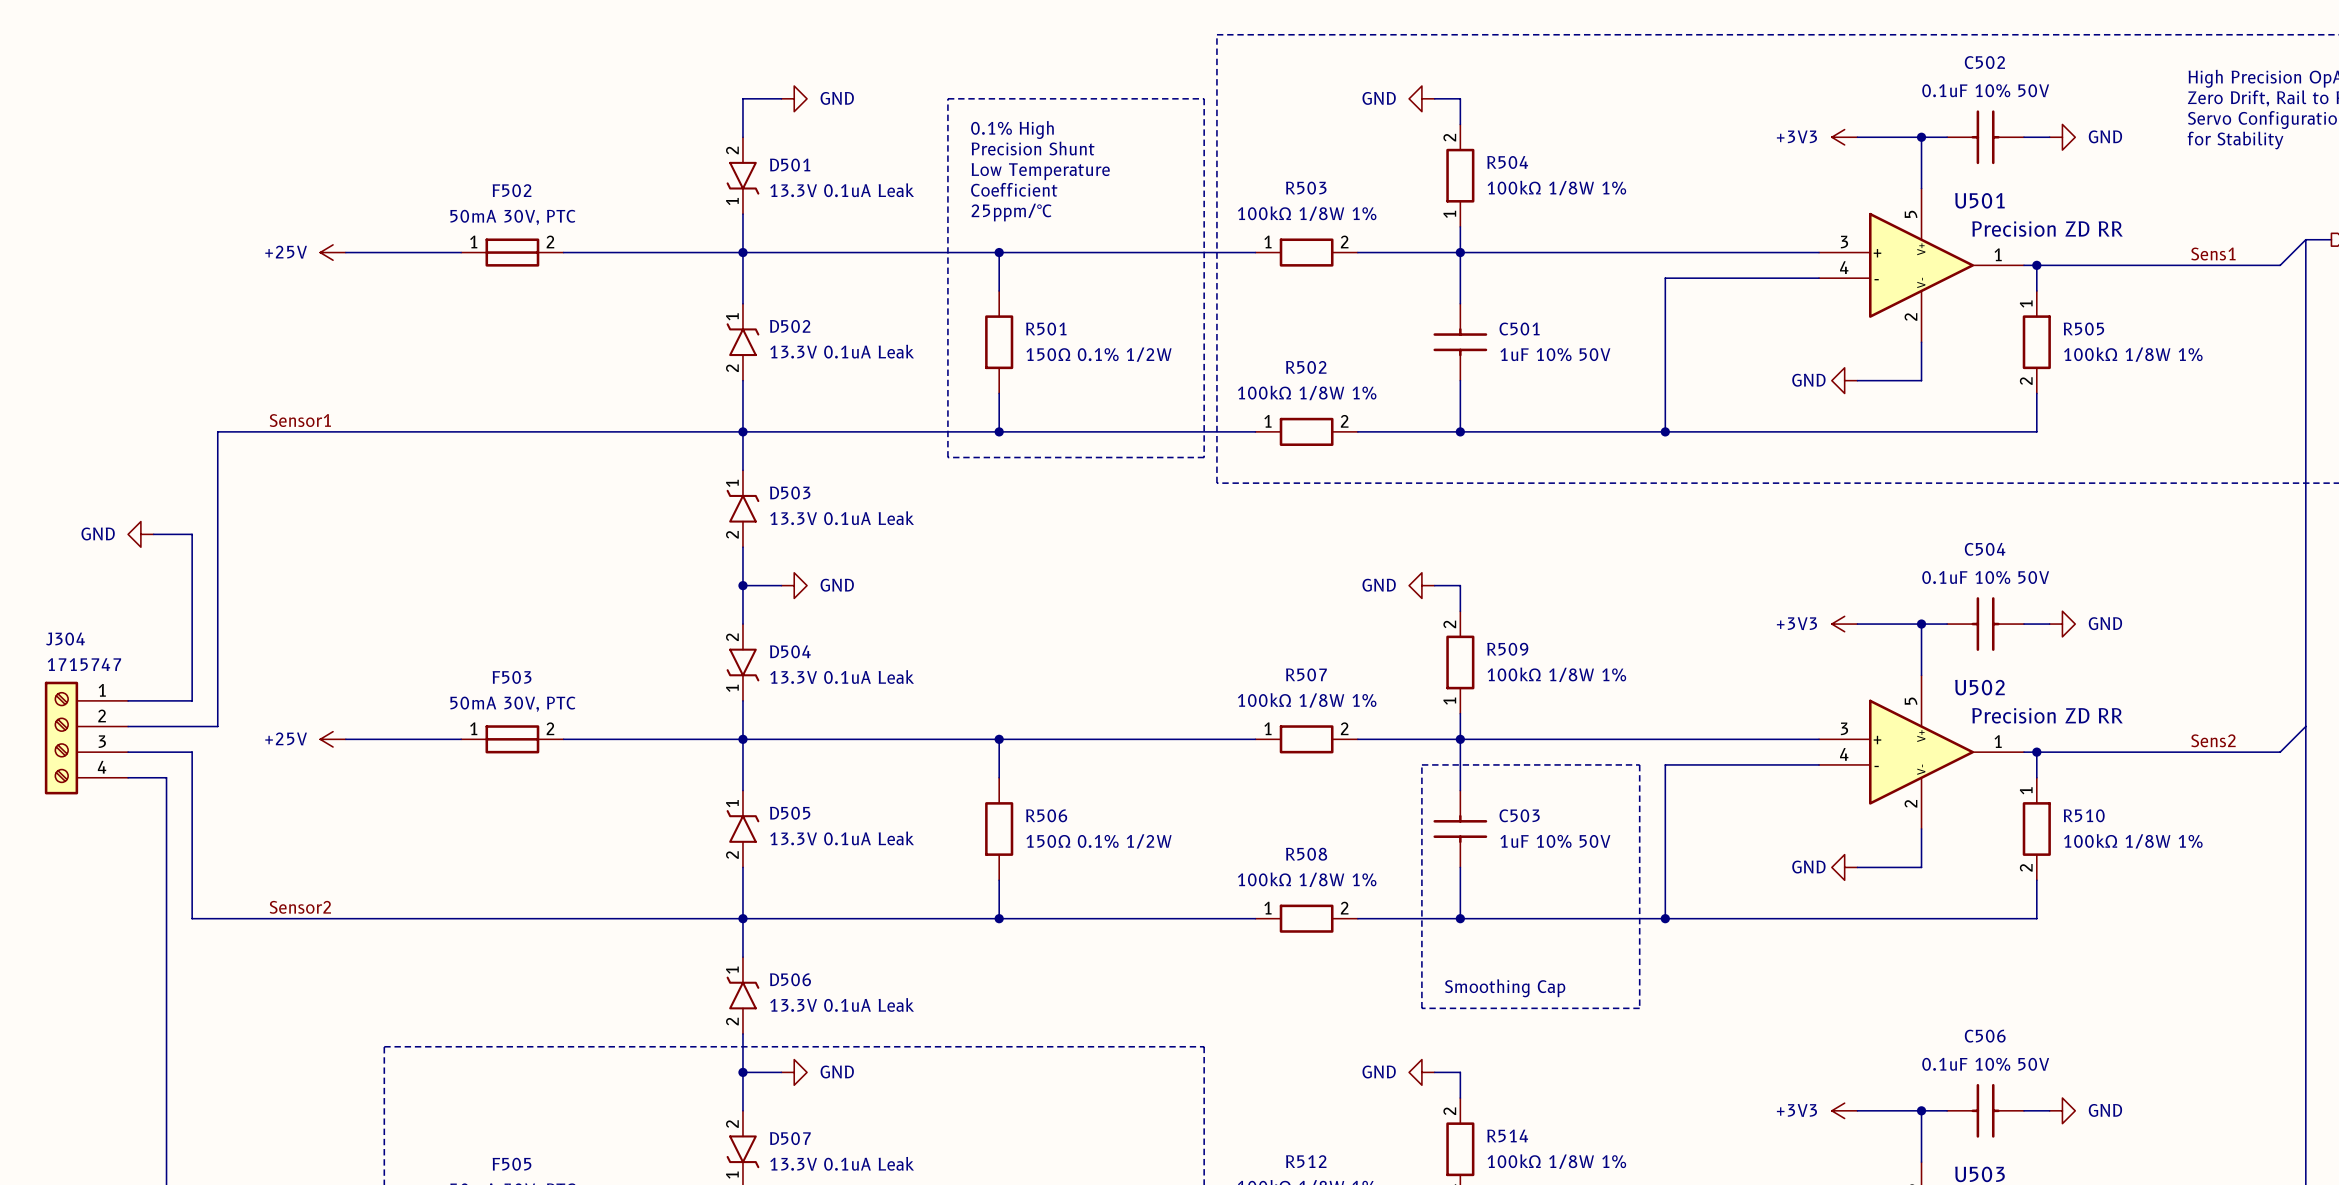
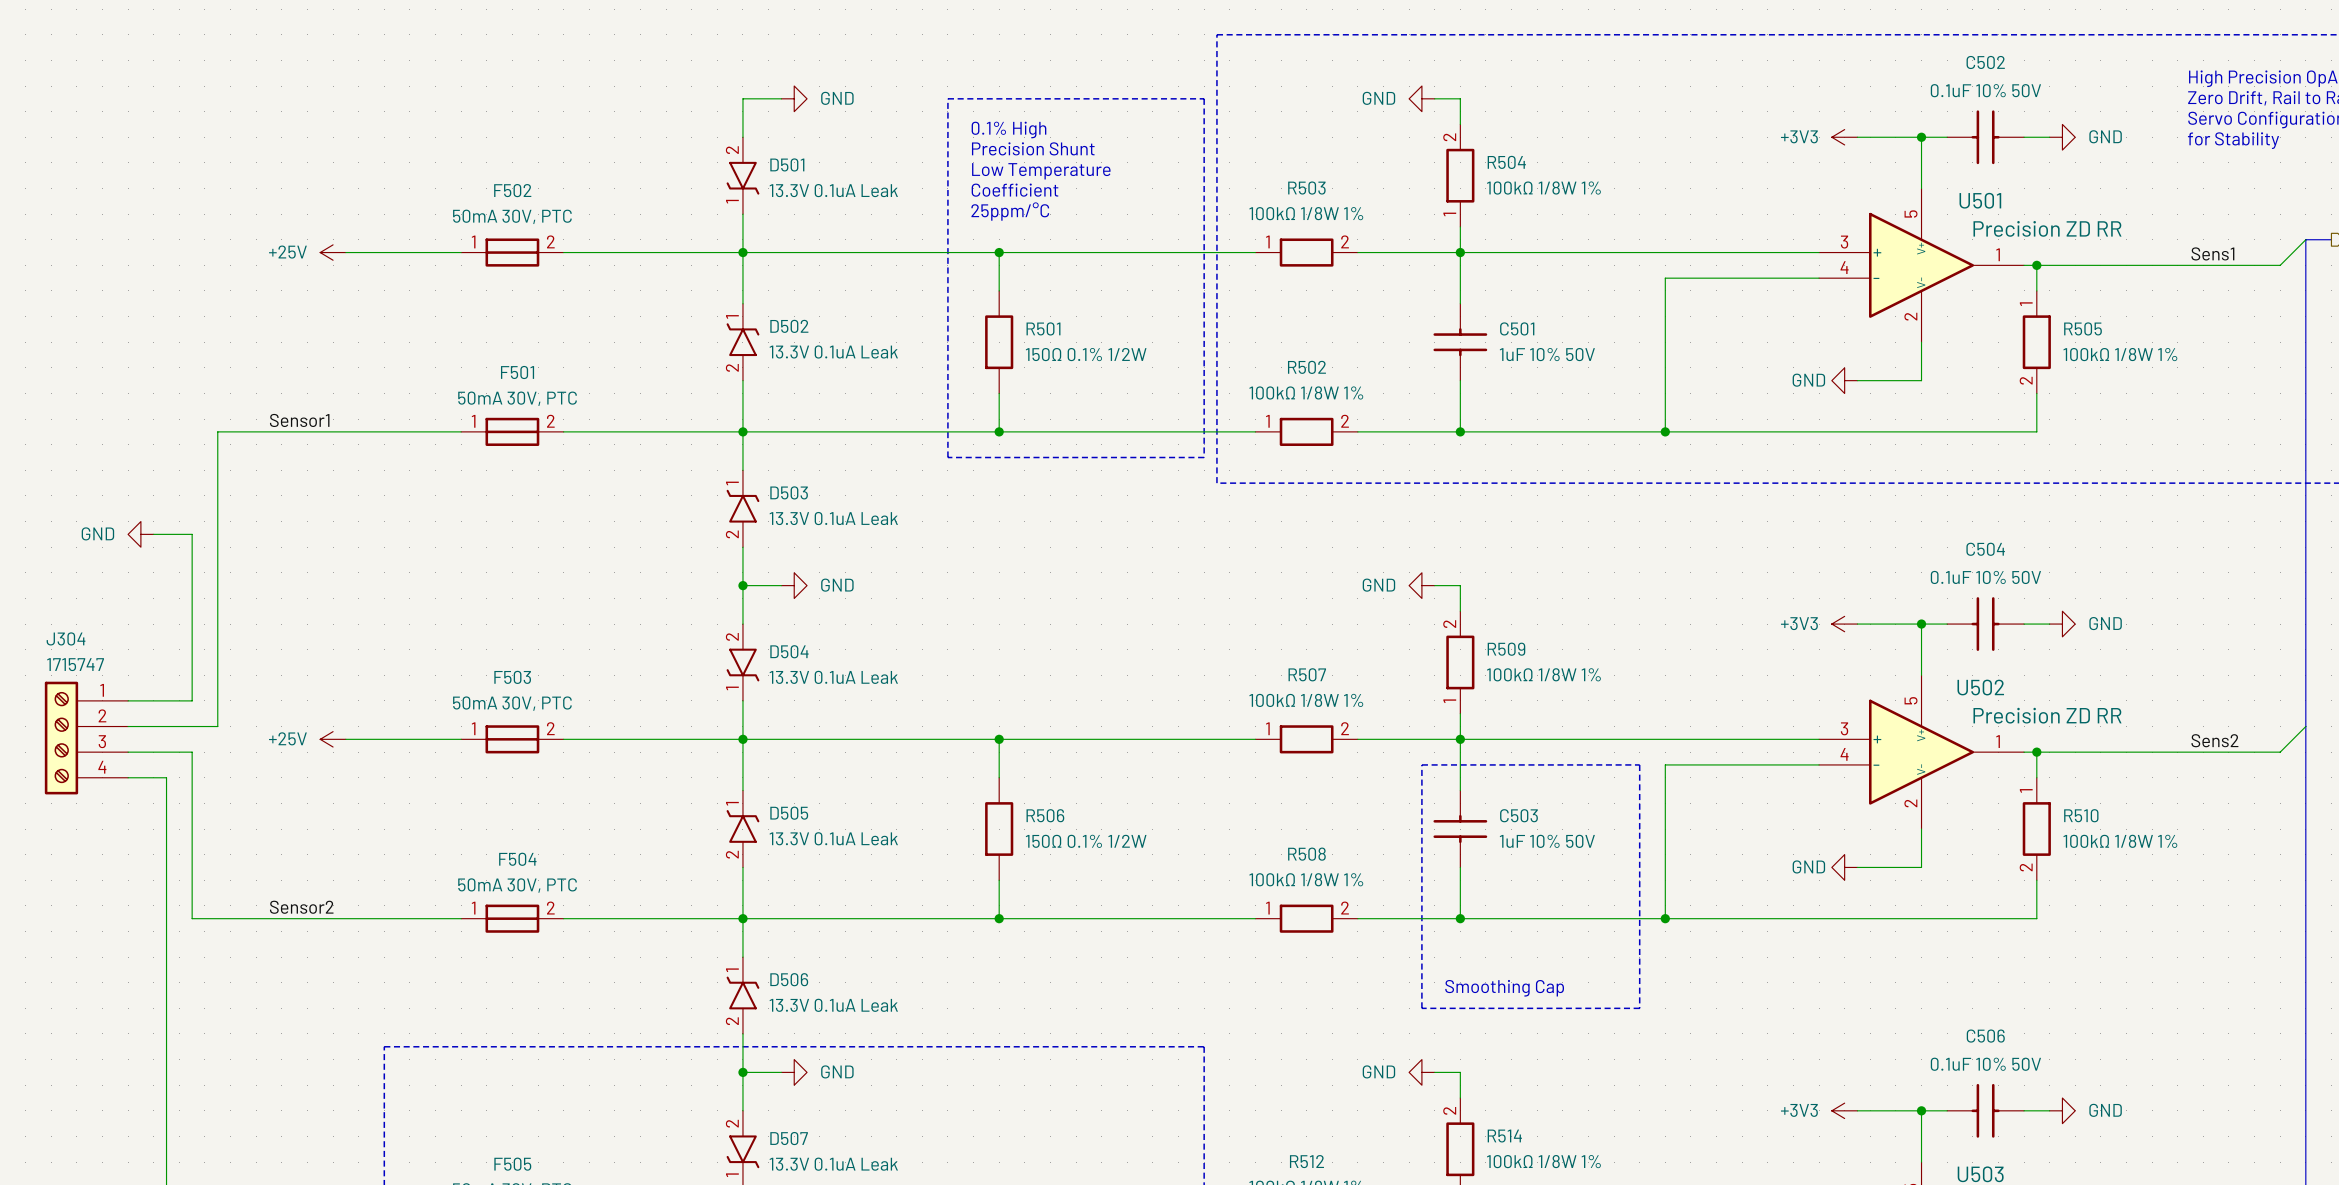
F501: none -> 50mA 30V, PTC (512, 431)
F504: none -> 50mA 30V, PTC (512, 918)

